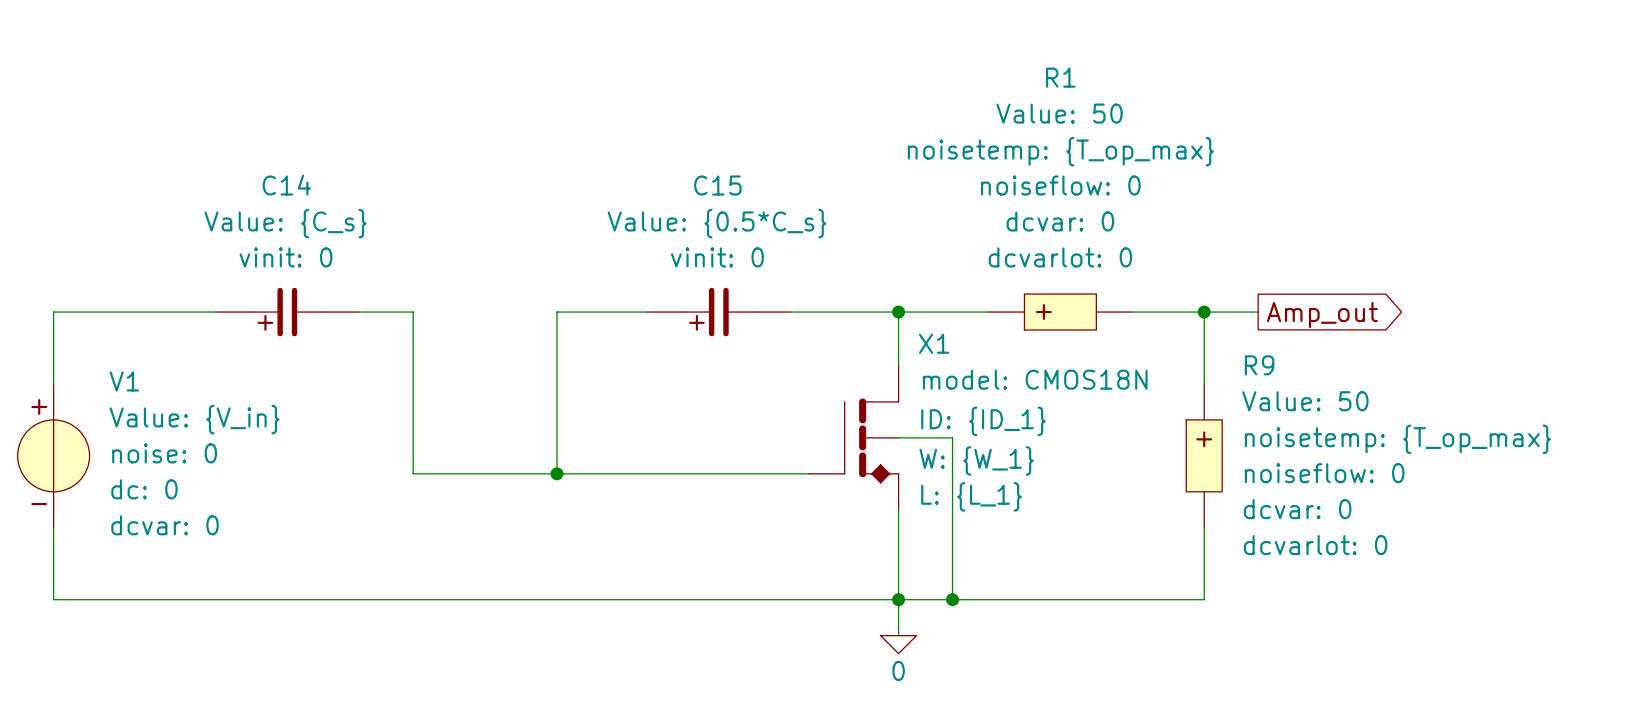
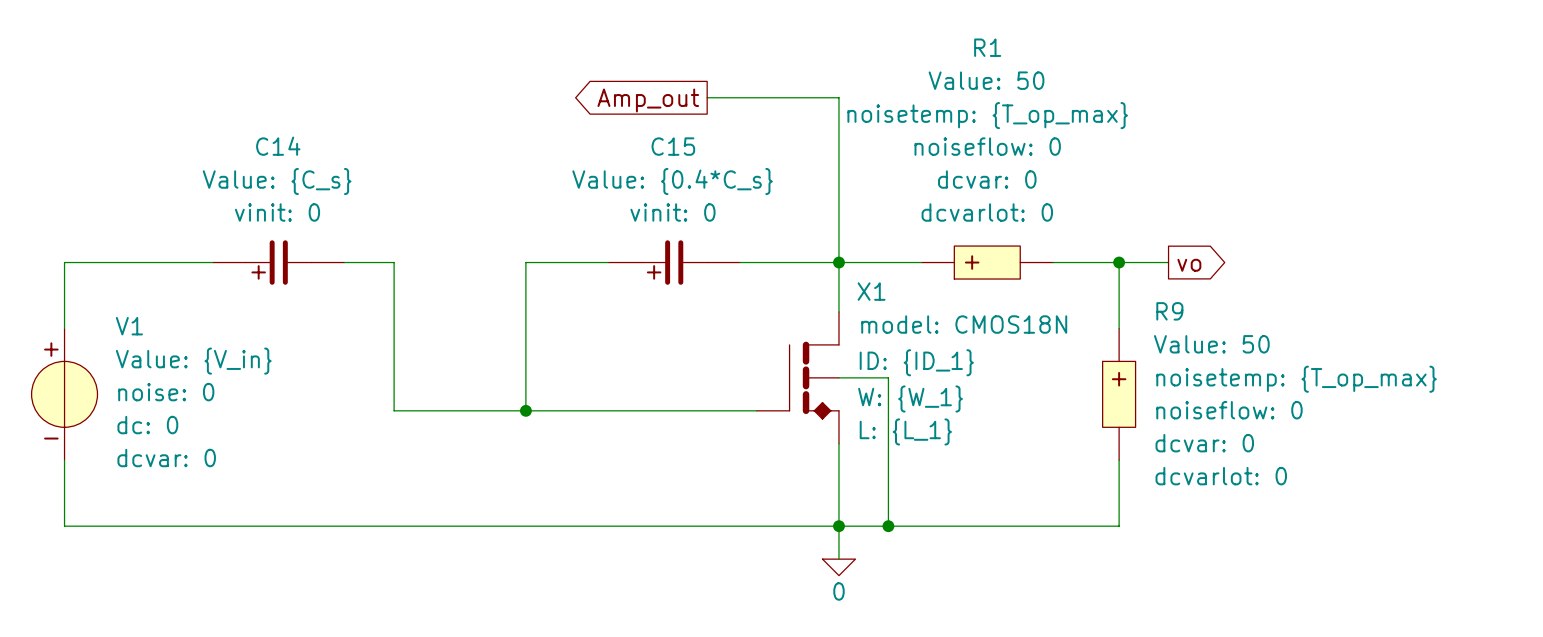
wire: none -> (707, 97) (838, 97) (838, 262)
global label: none -> Amp_out (648, 100)
C15 value: Value: {0.5*C_s} (717, 223) -> Value: {0.4*C_s} (672, 181)
global label: Amp_out (1322, 315) -> vo (1189, 265)

